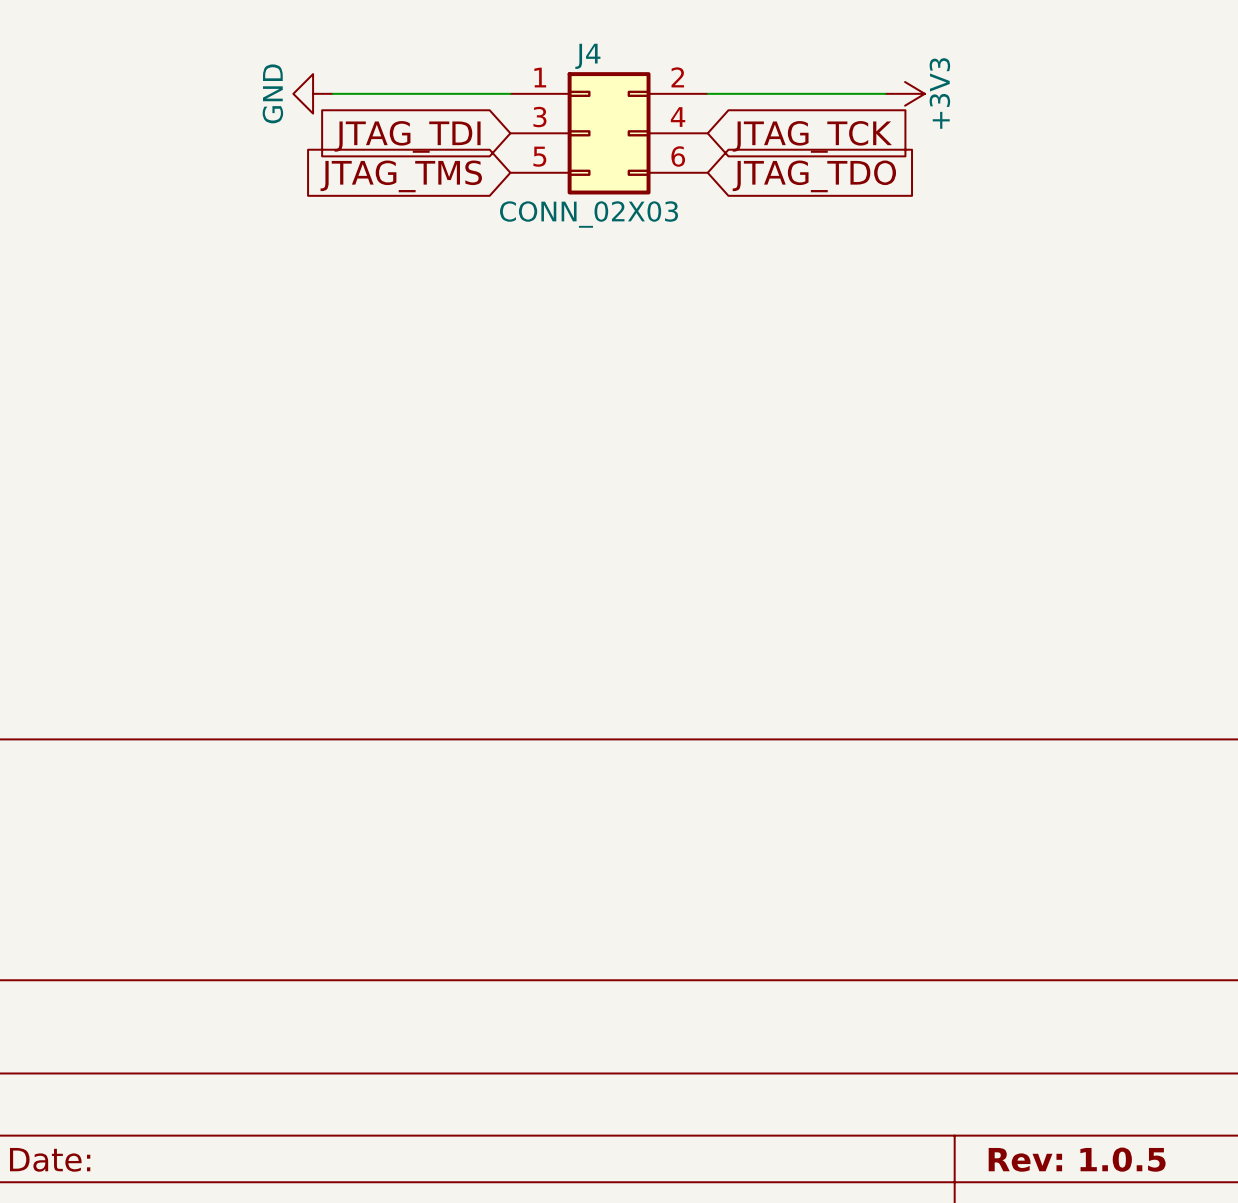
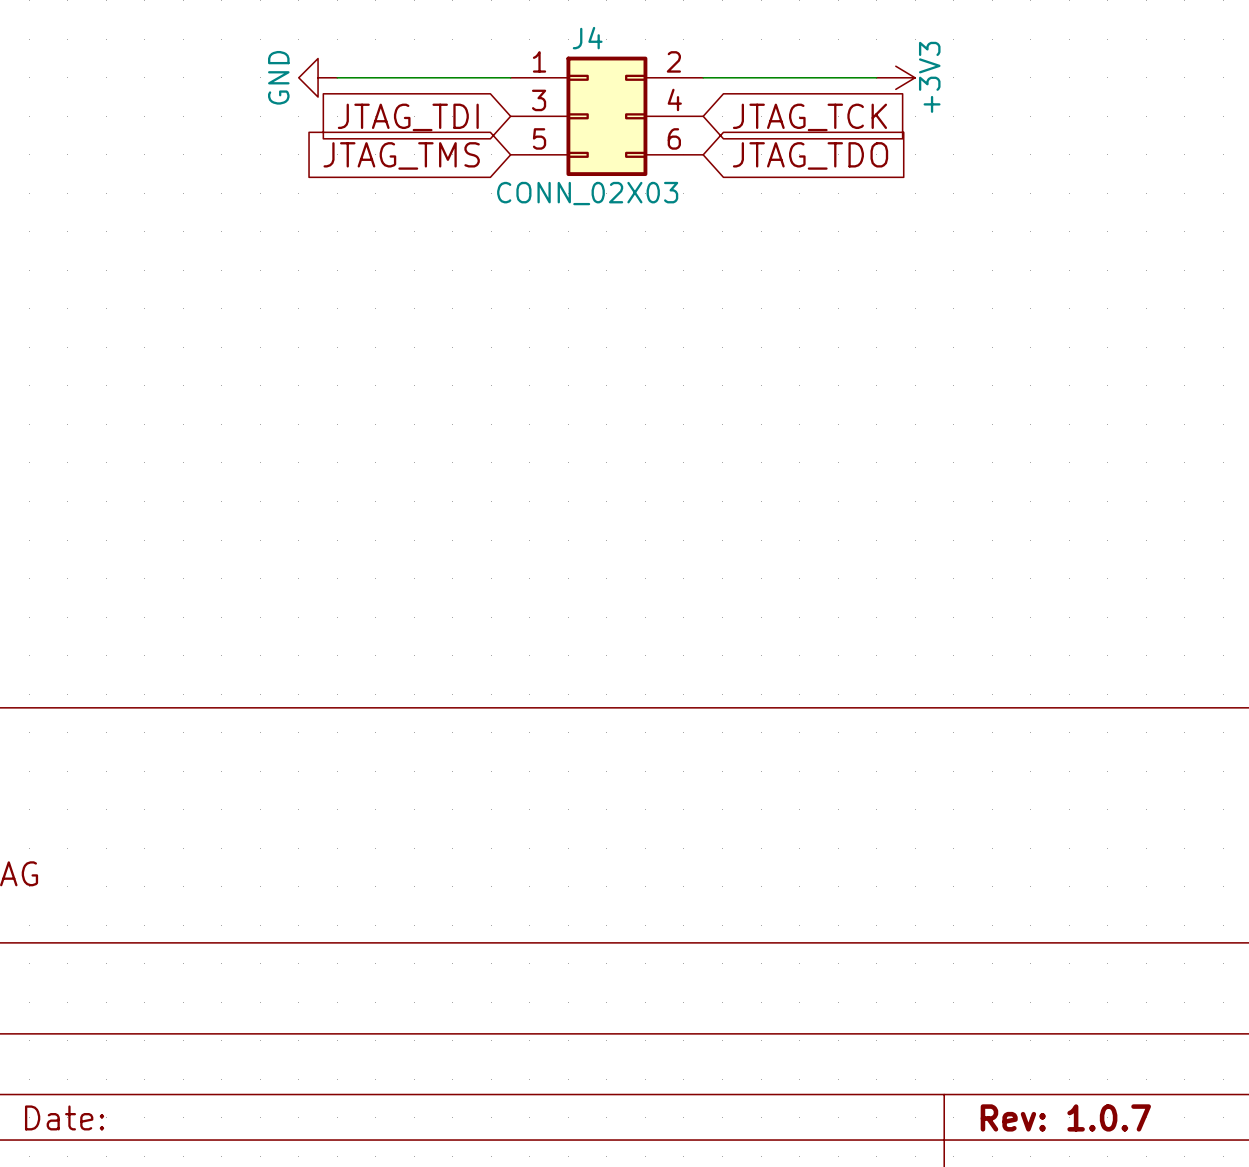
title block: Rev: 1.0.5 (1077, 1159) -> Rev: 1.0.7 (1065, 1117)

